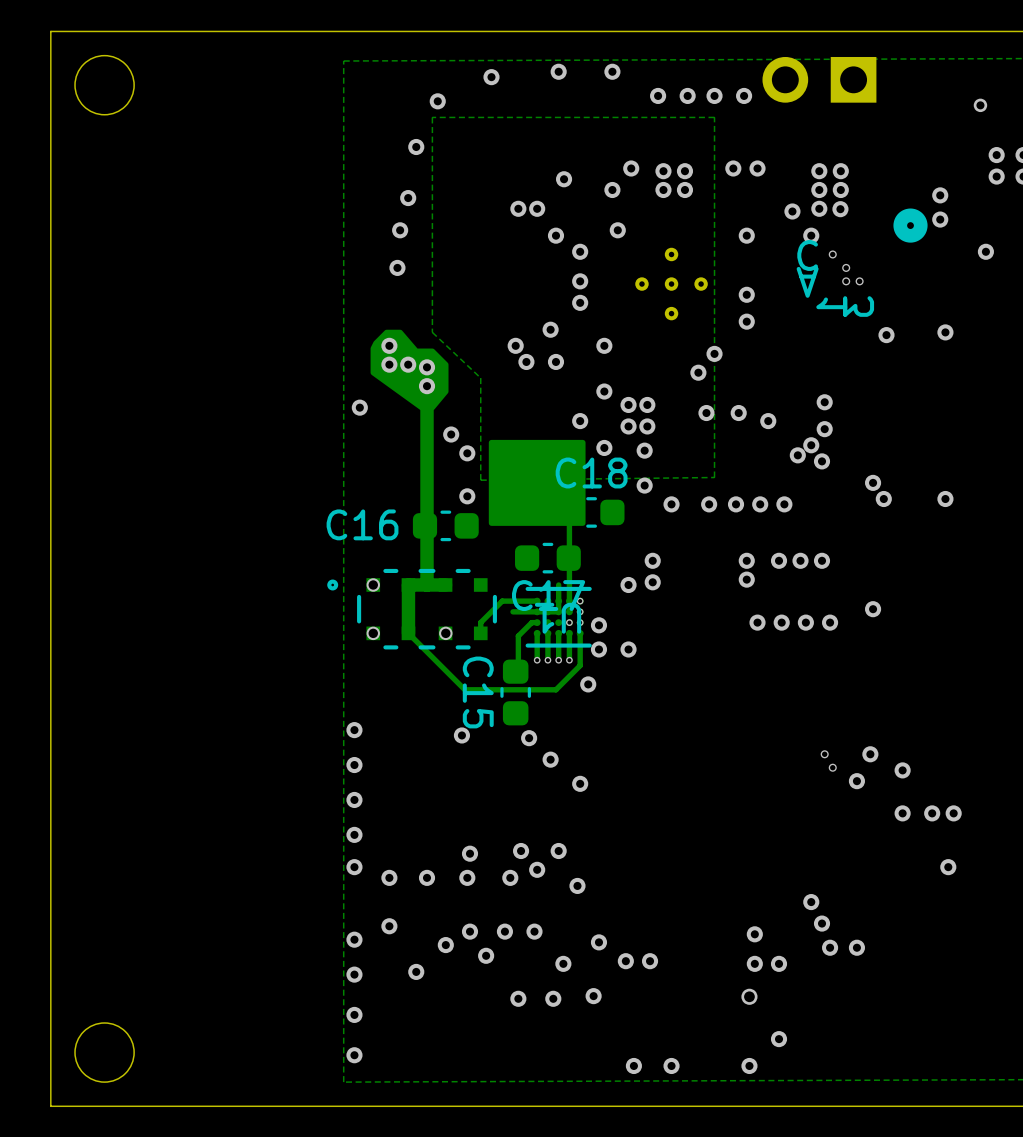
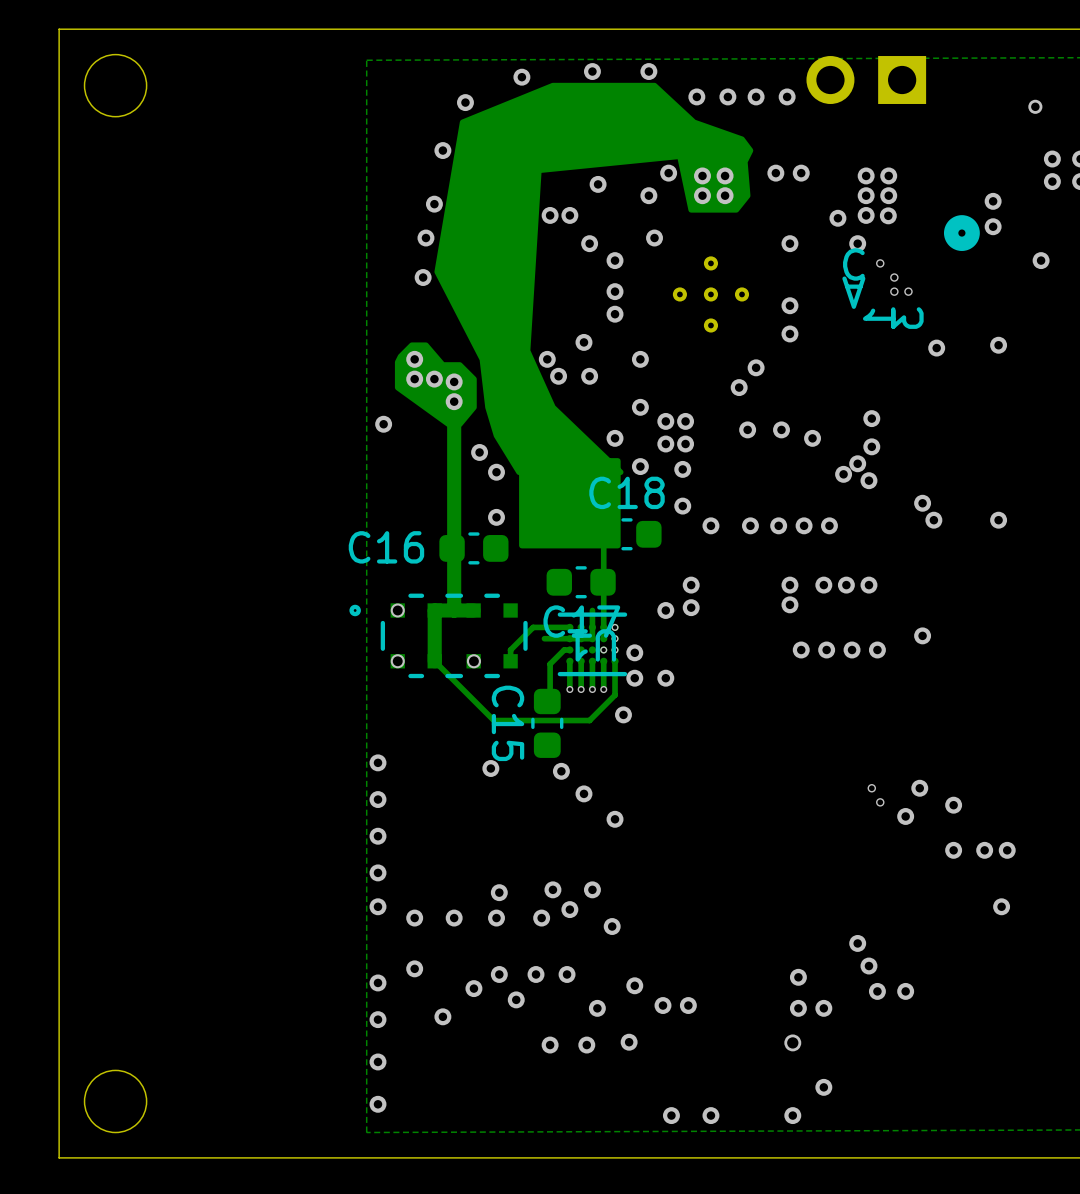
drawing: none -> [434, 82, 754, 476]
zone outline: (714, 117) (432, 117) (432, 332) (480, 378) (480, 480) (714, 477) (714, 117) -> none

